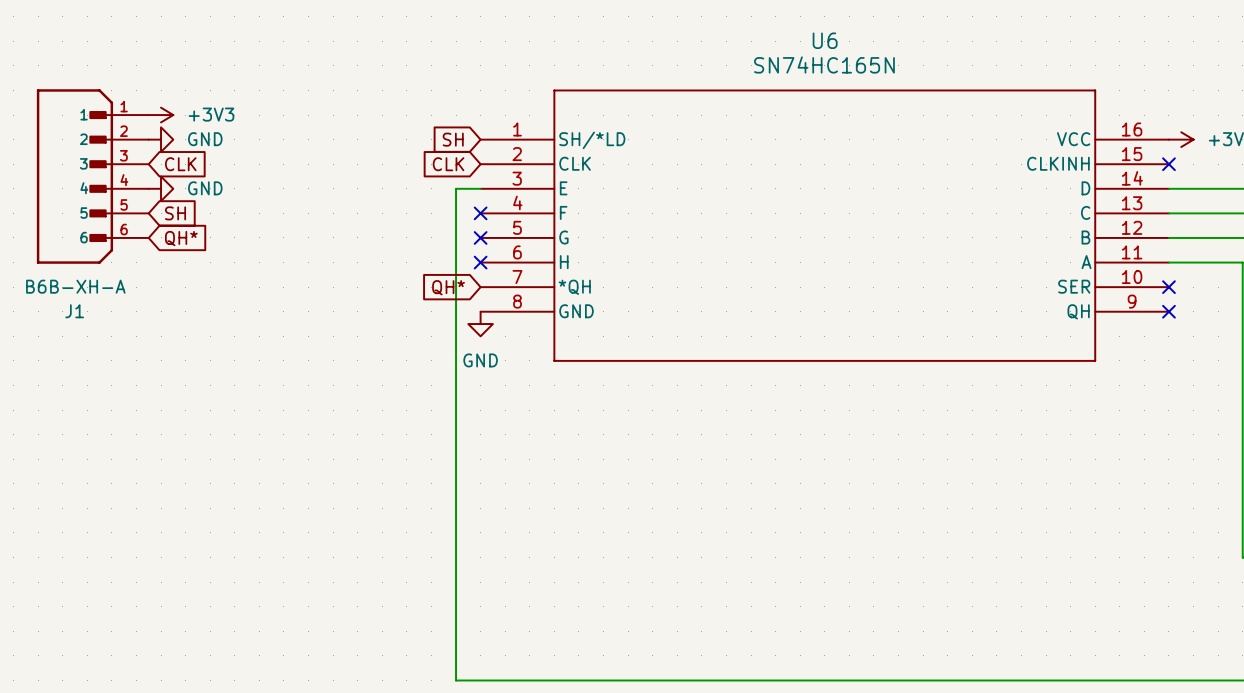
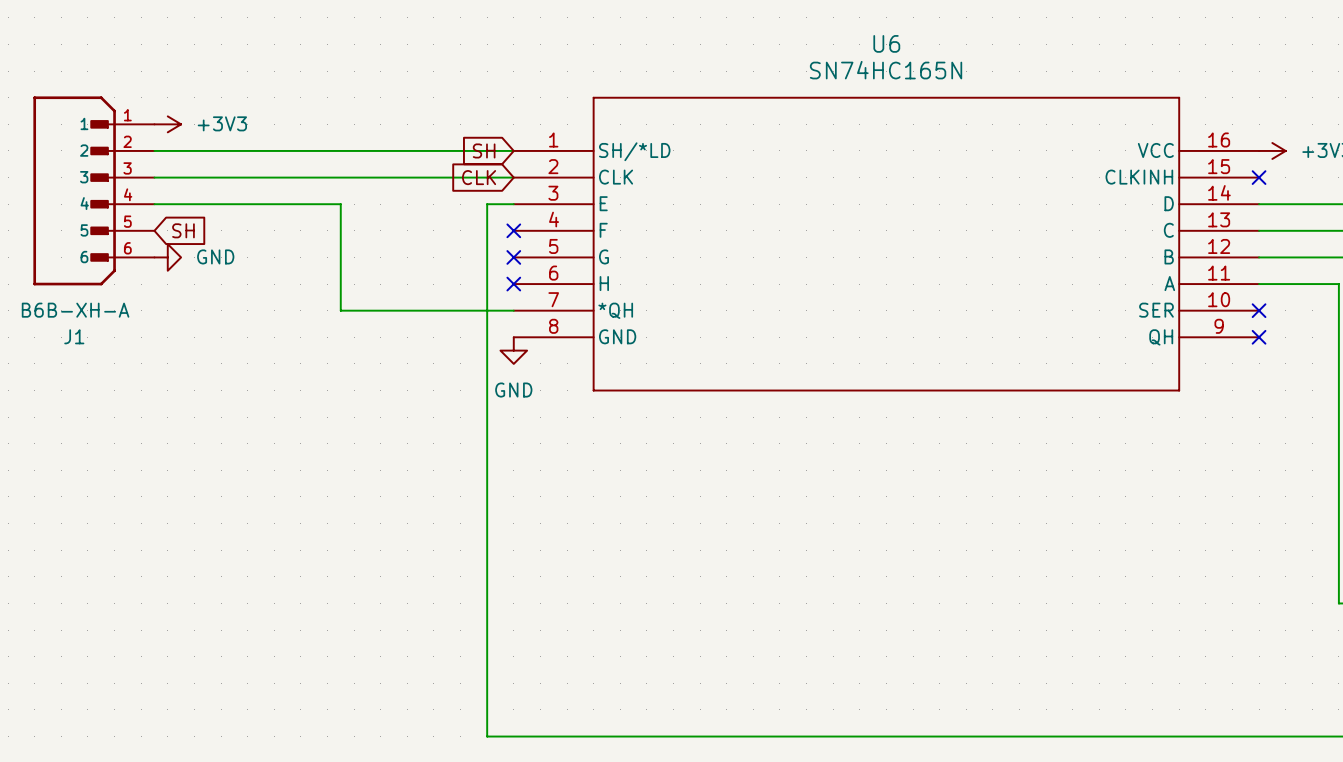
wire: none -> (154, 150) (513, 150)
power symbol: GND (161, 139) -> none
wire: none -> (154, 177) (513, 177)
global label: CLK (180, 164) -> none
wire: none -> (154, 204) (340, 204) (340, 310) (513, 310)
power symbol: GND (161, 188) -> none
power symbol: none -> GND (167, 257)
global label: QH* (181, 238) -> none
global label: QH* (448, 287) -> none

